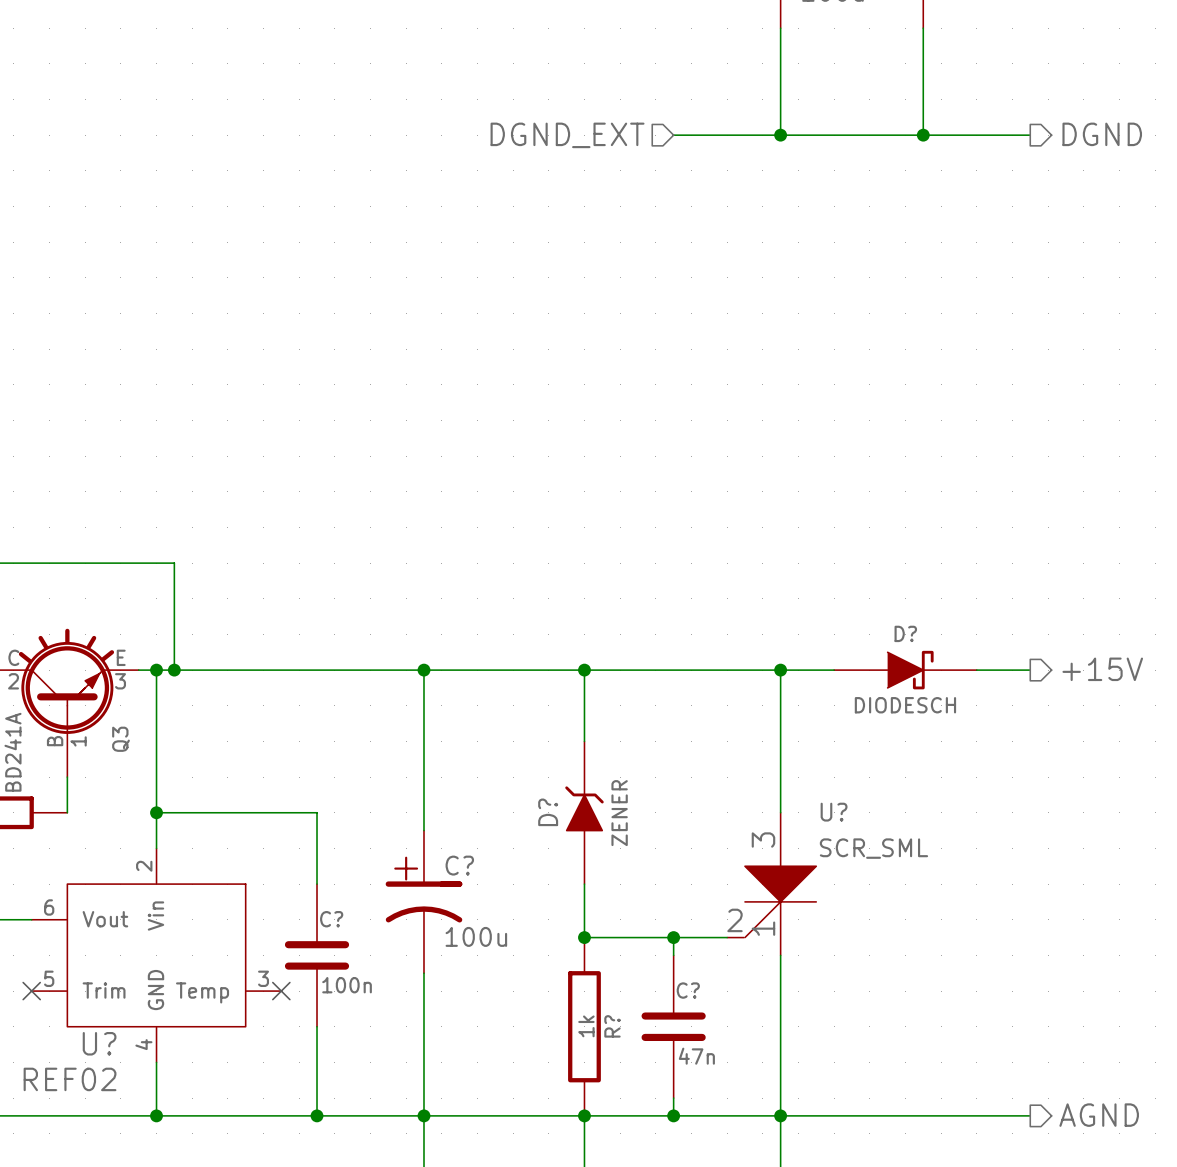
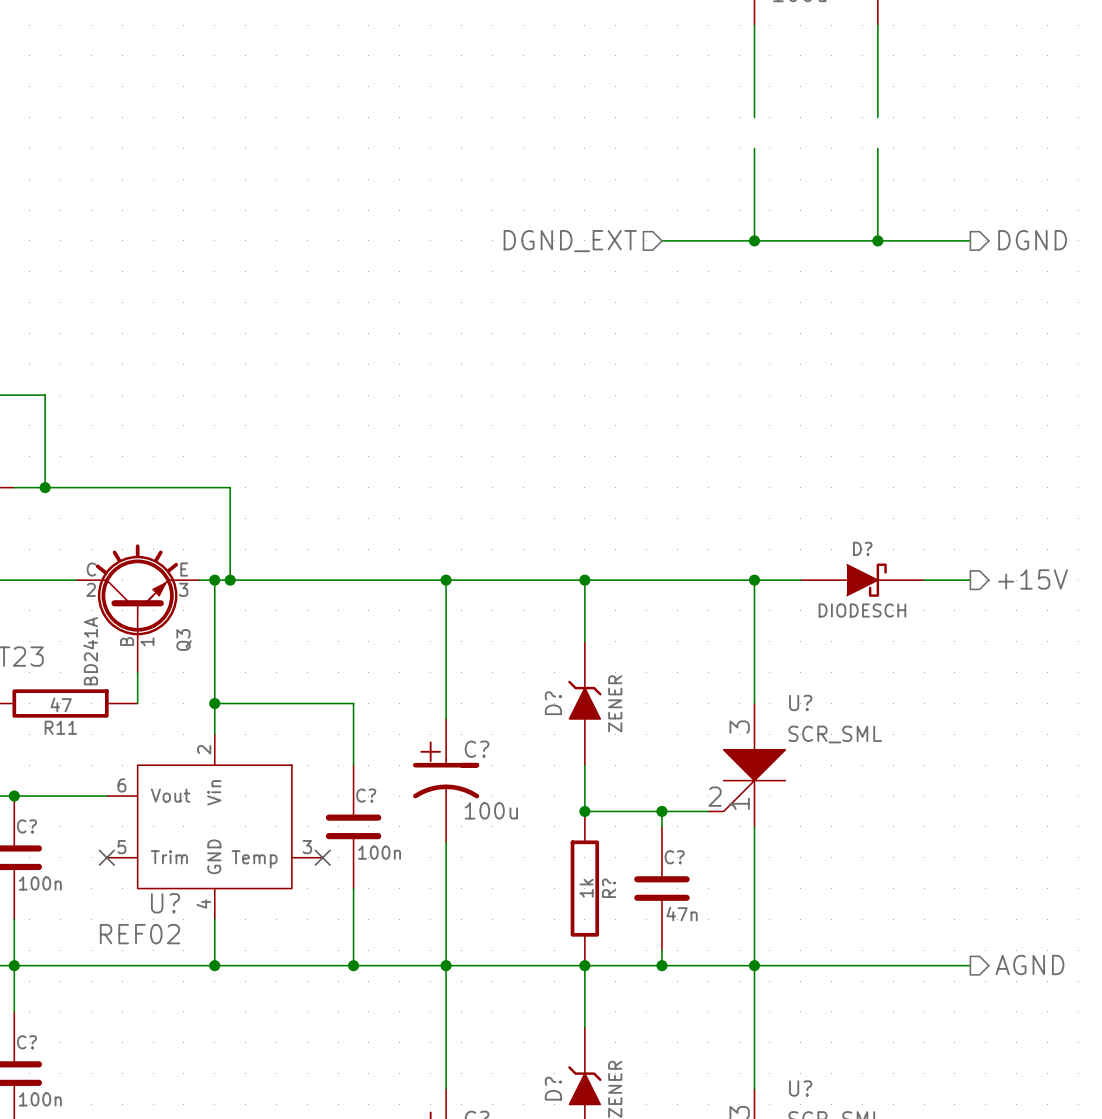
hierarchical label position: DGND (1102, 134) -> DGND (1032, 240)
hierarchical label position: DGND_EXT (567, 135) -> DGND_EXT (570, 241)
wire: (673, 135) (1030, 135) -> (661, 240) (970, 240)
junction: (780, 135) -> none
junction: (923, 135) -> none
wire: none -> (754, 148) (754, 240)
wire: none -> (877, 148) (877, 240)
junction: none -> (754, 240)
junction: none -> (877, 240)

